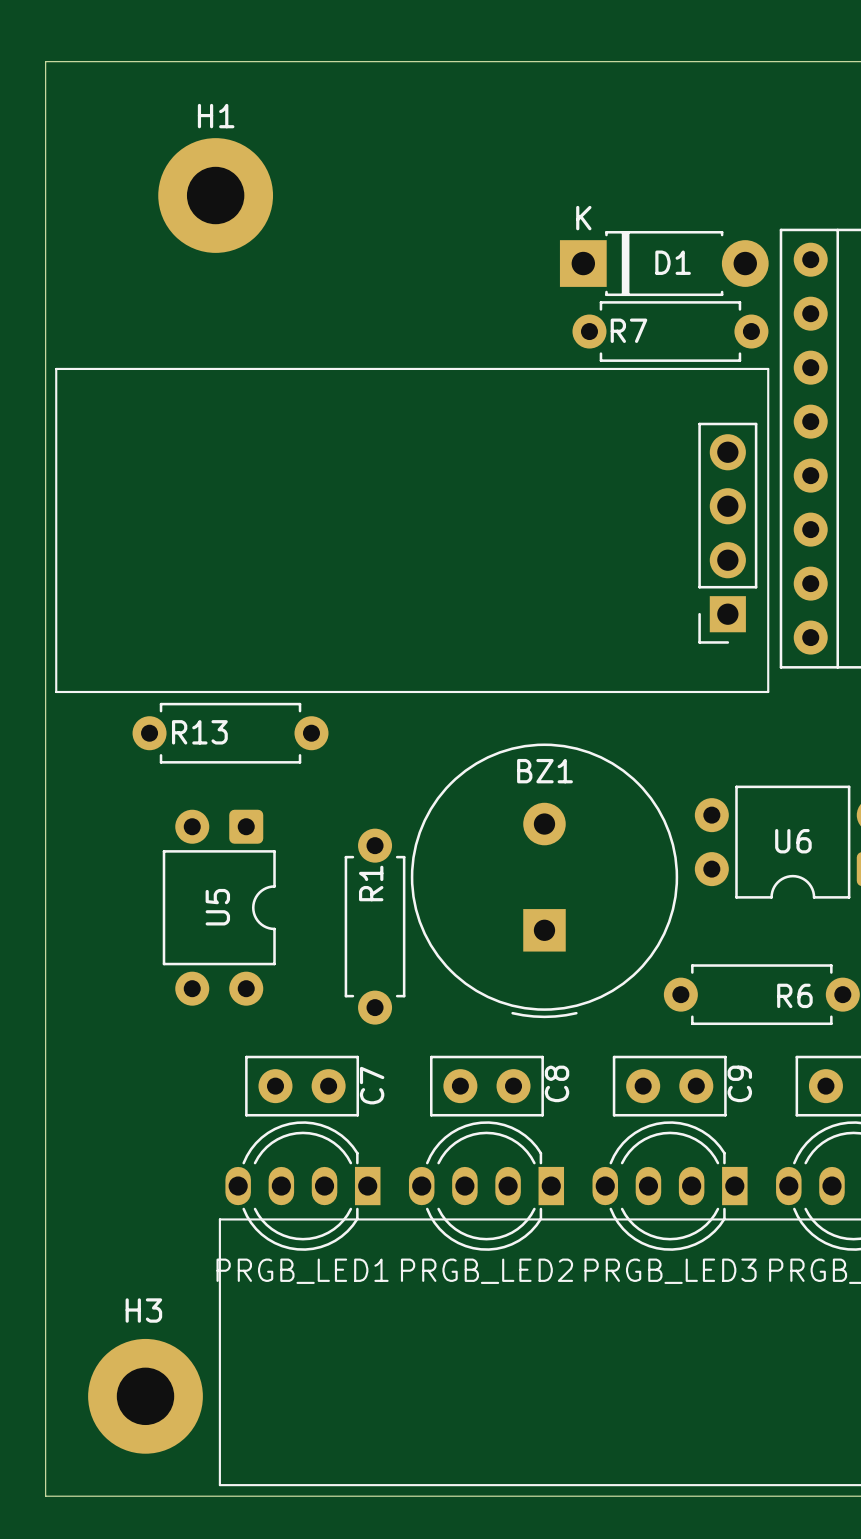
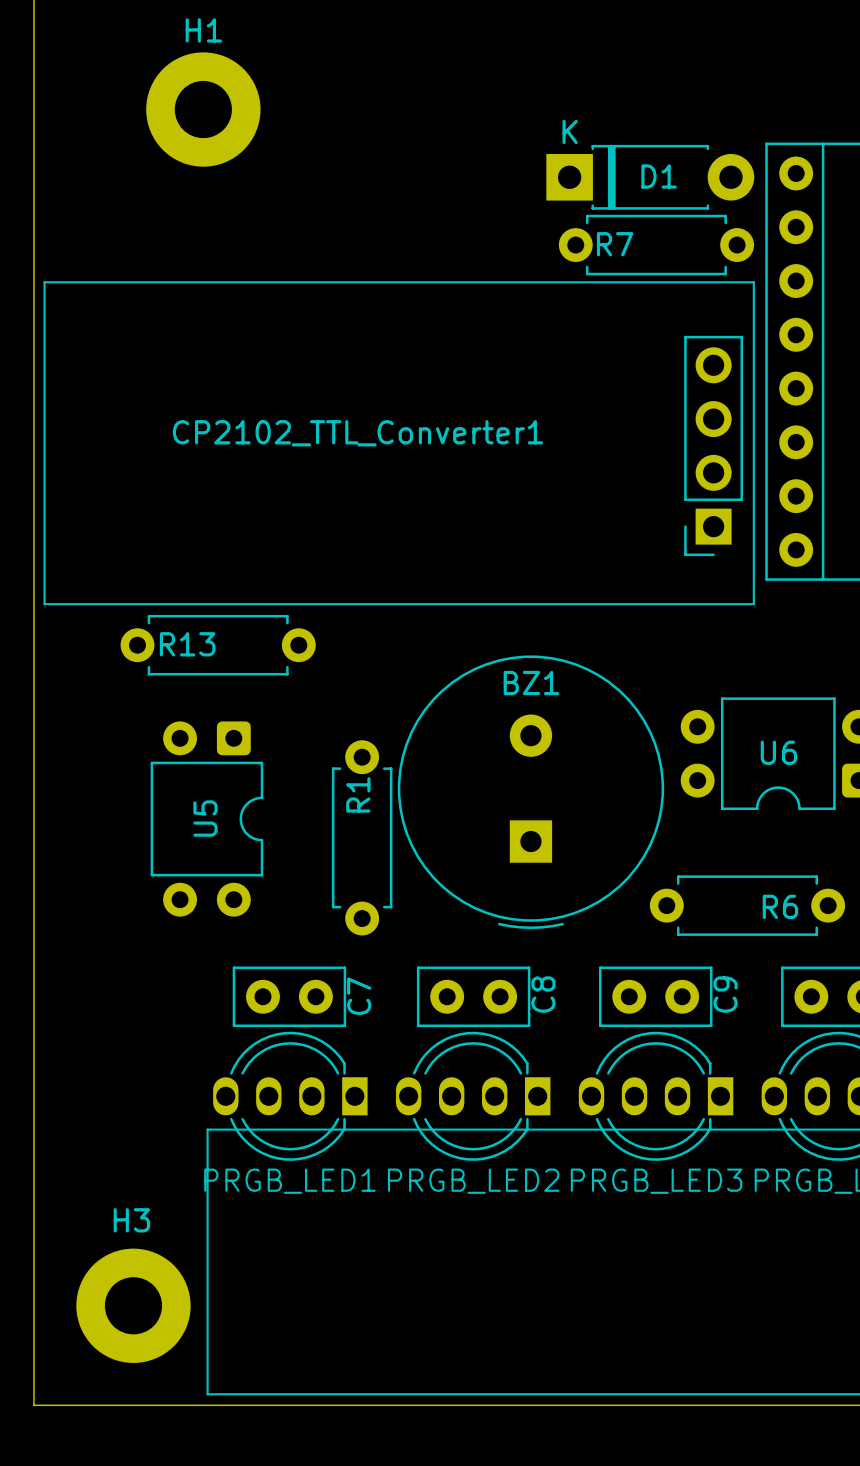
CP2102_TTL_Converter1 name: none -> CP2102_TTL_Converter1 (357, 433)

